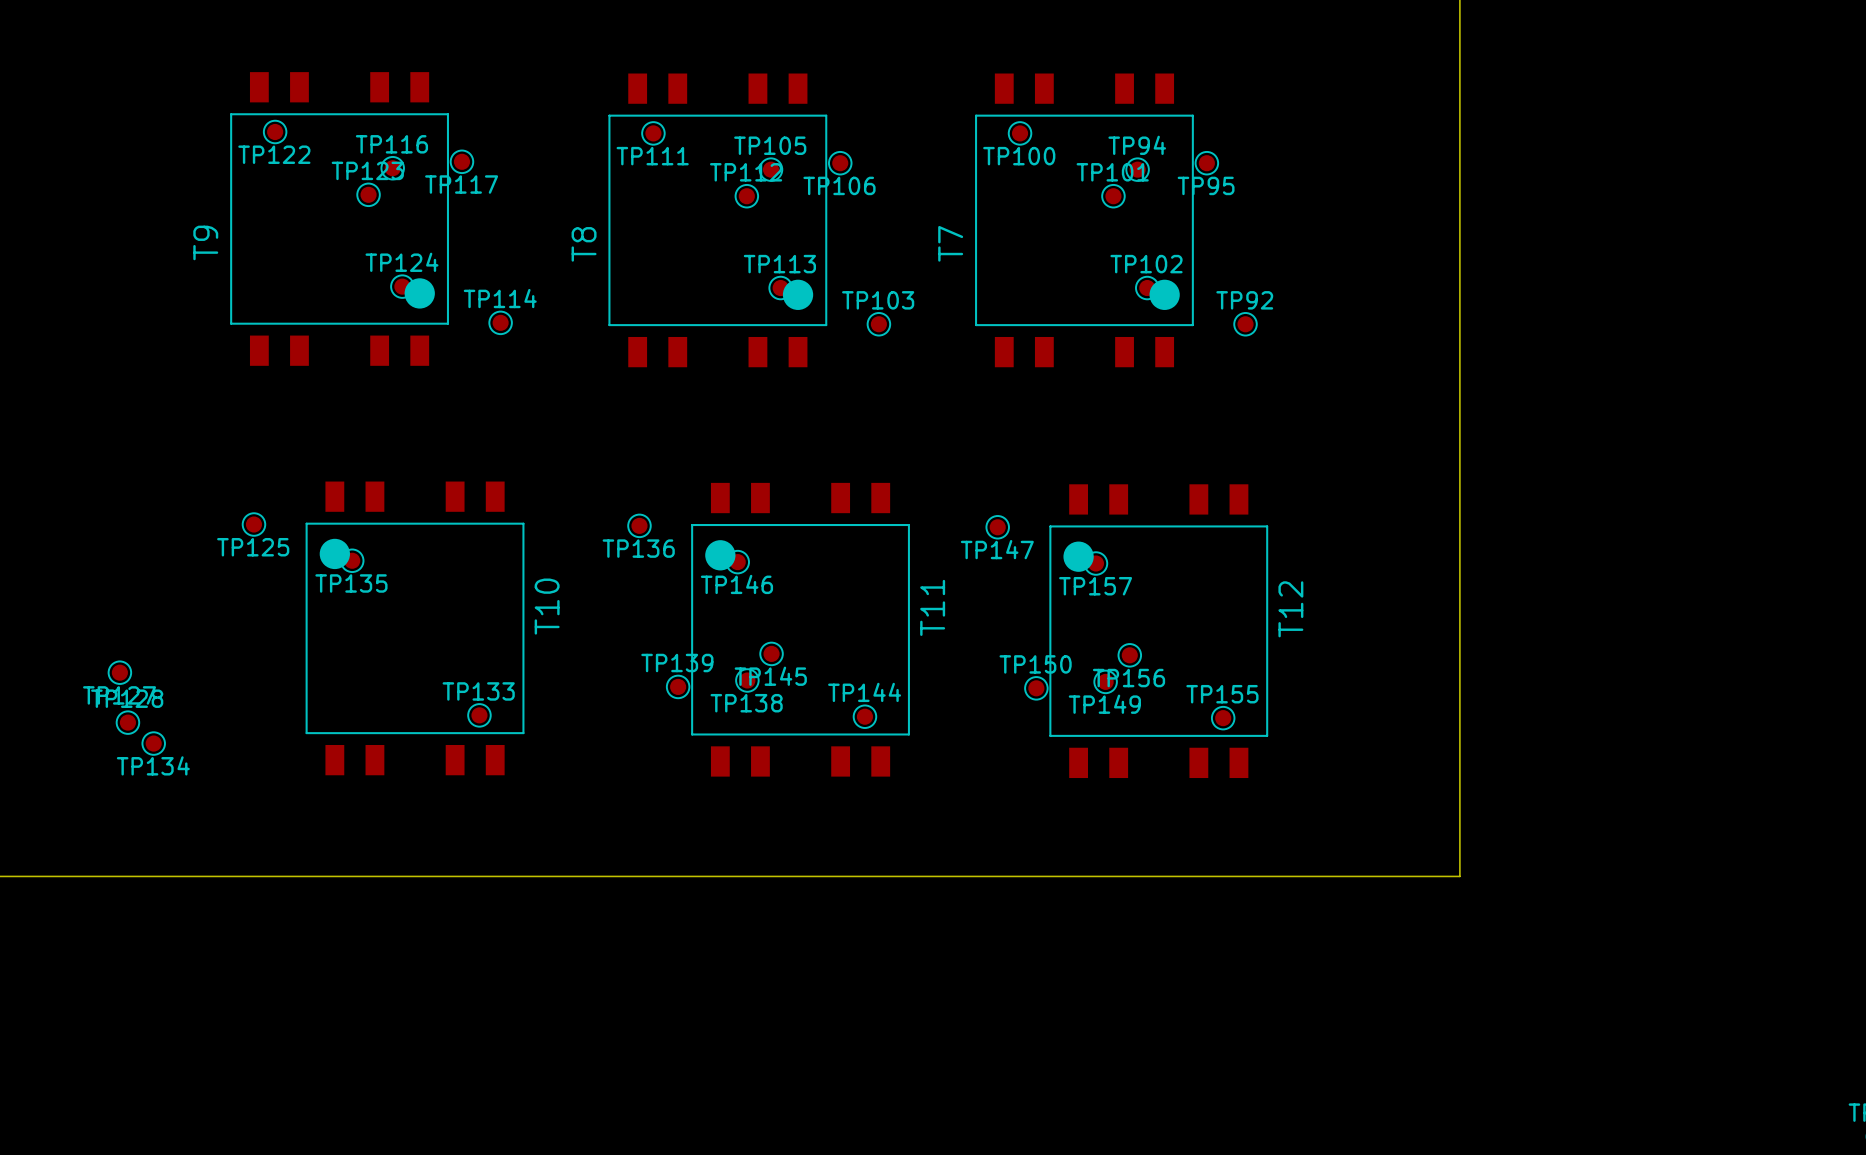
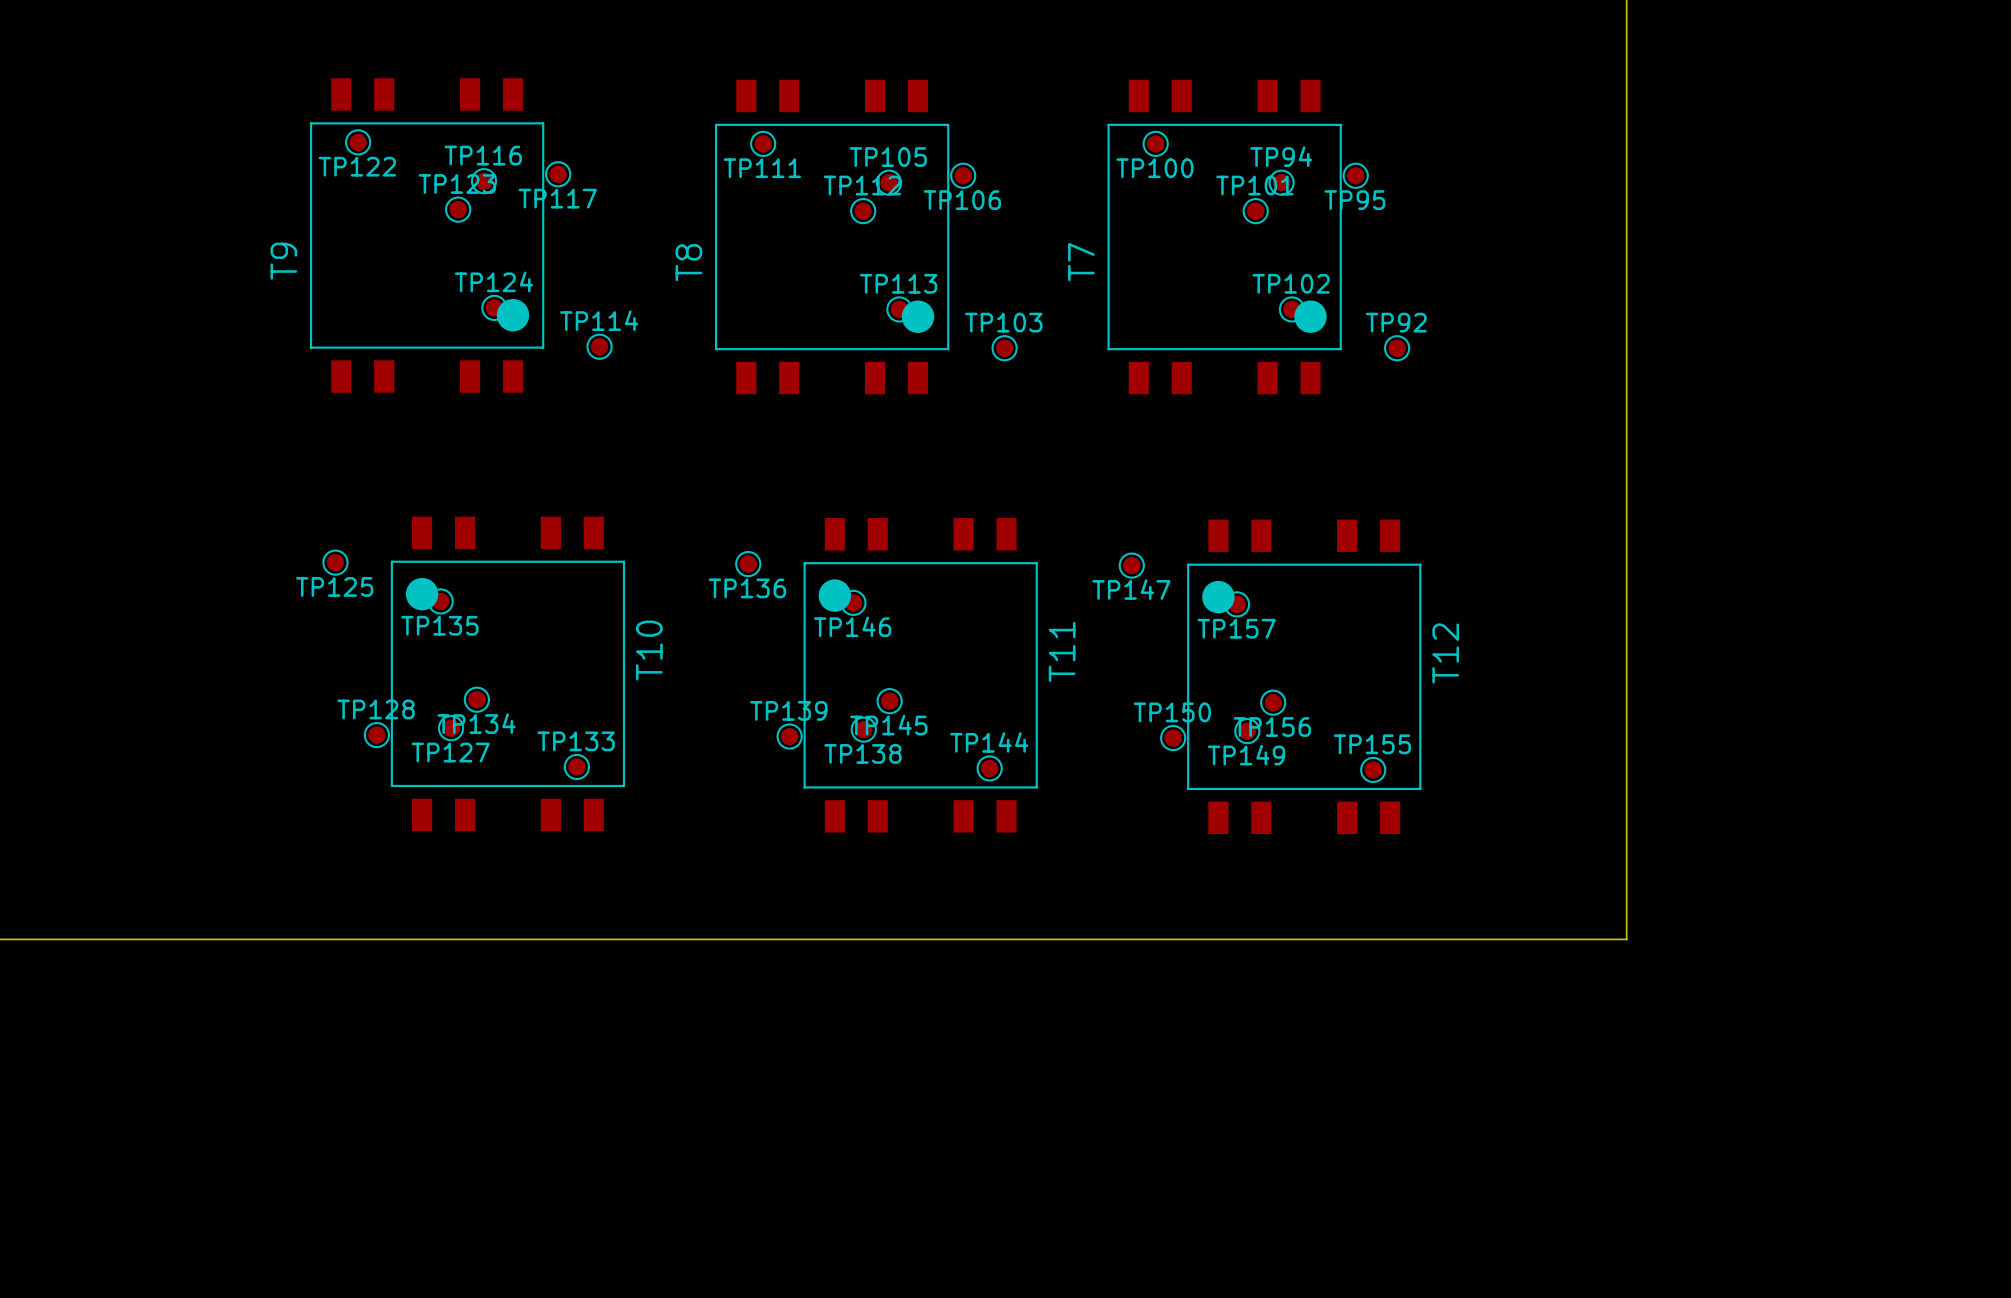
TP127 position: (119, 672) -> (451, 728)
TP128 position: (127, 722) -> (376, 735)
TP134 position: (153, 743) -> (476, 699)

